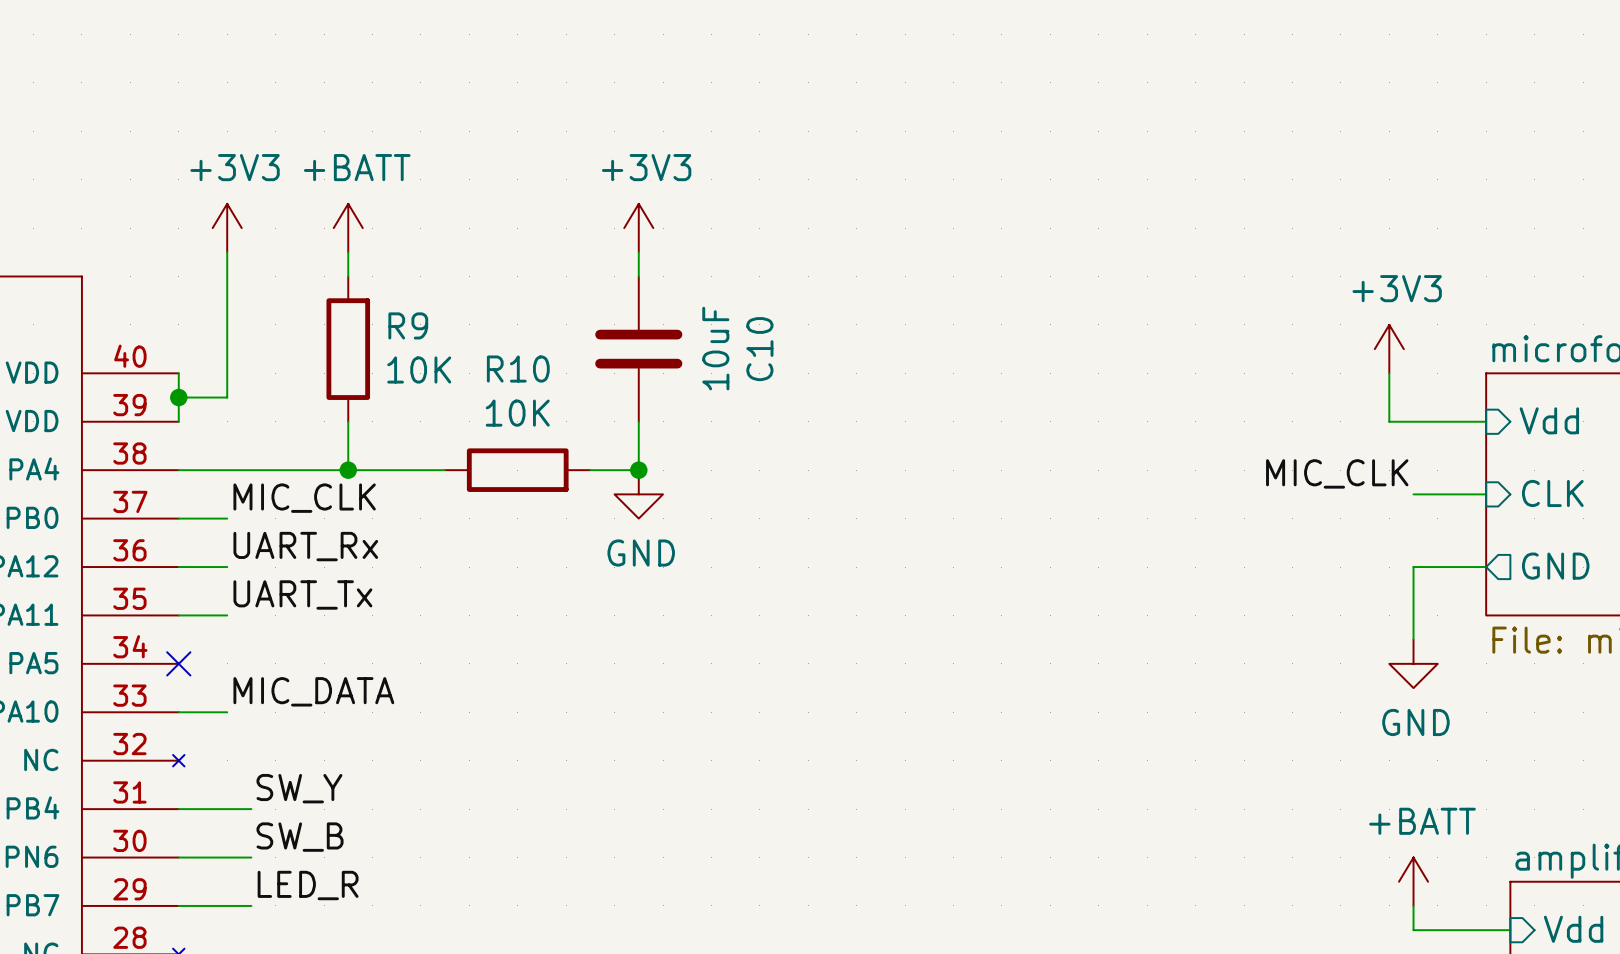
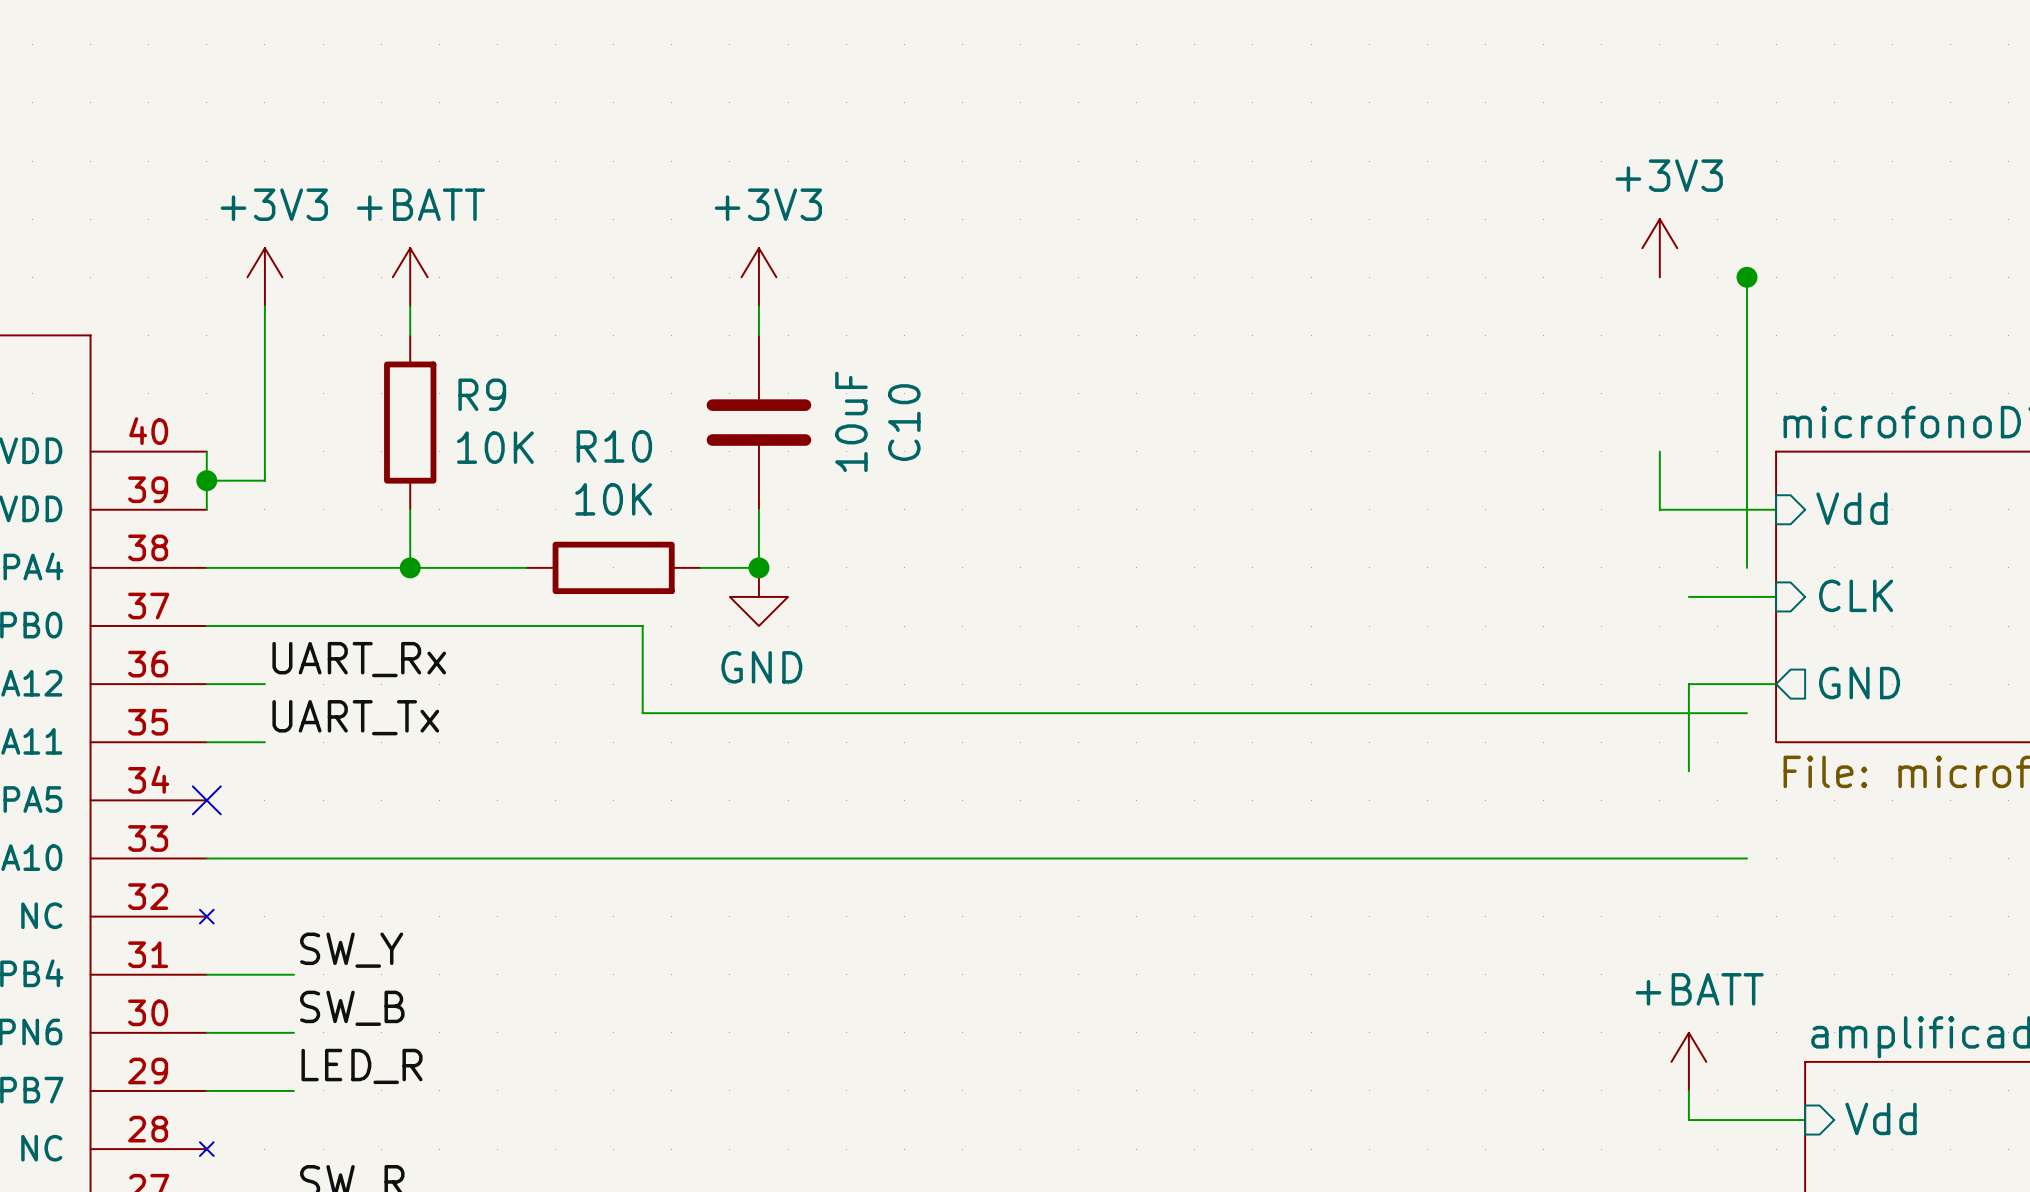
wire: none -> (1747, 277) (1747, 567)
junction: none -> (1747, 277)
power symbol position: +3V3 (1389, 349) -> +3V3 (1659, 248)
label: MIC_CLK (1337, 473) -> none
label: MIC_CLK (304, 498) -> none
wire: none -> (264, 626) (642, 626) (642, 713) (1747, 713)
power symbol: GND (1413, 663) -> none
label: MIC_DATA (313, 691) -> none
wire: none -> (264, 858) (1747, 858)

